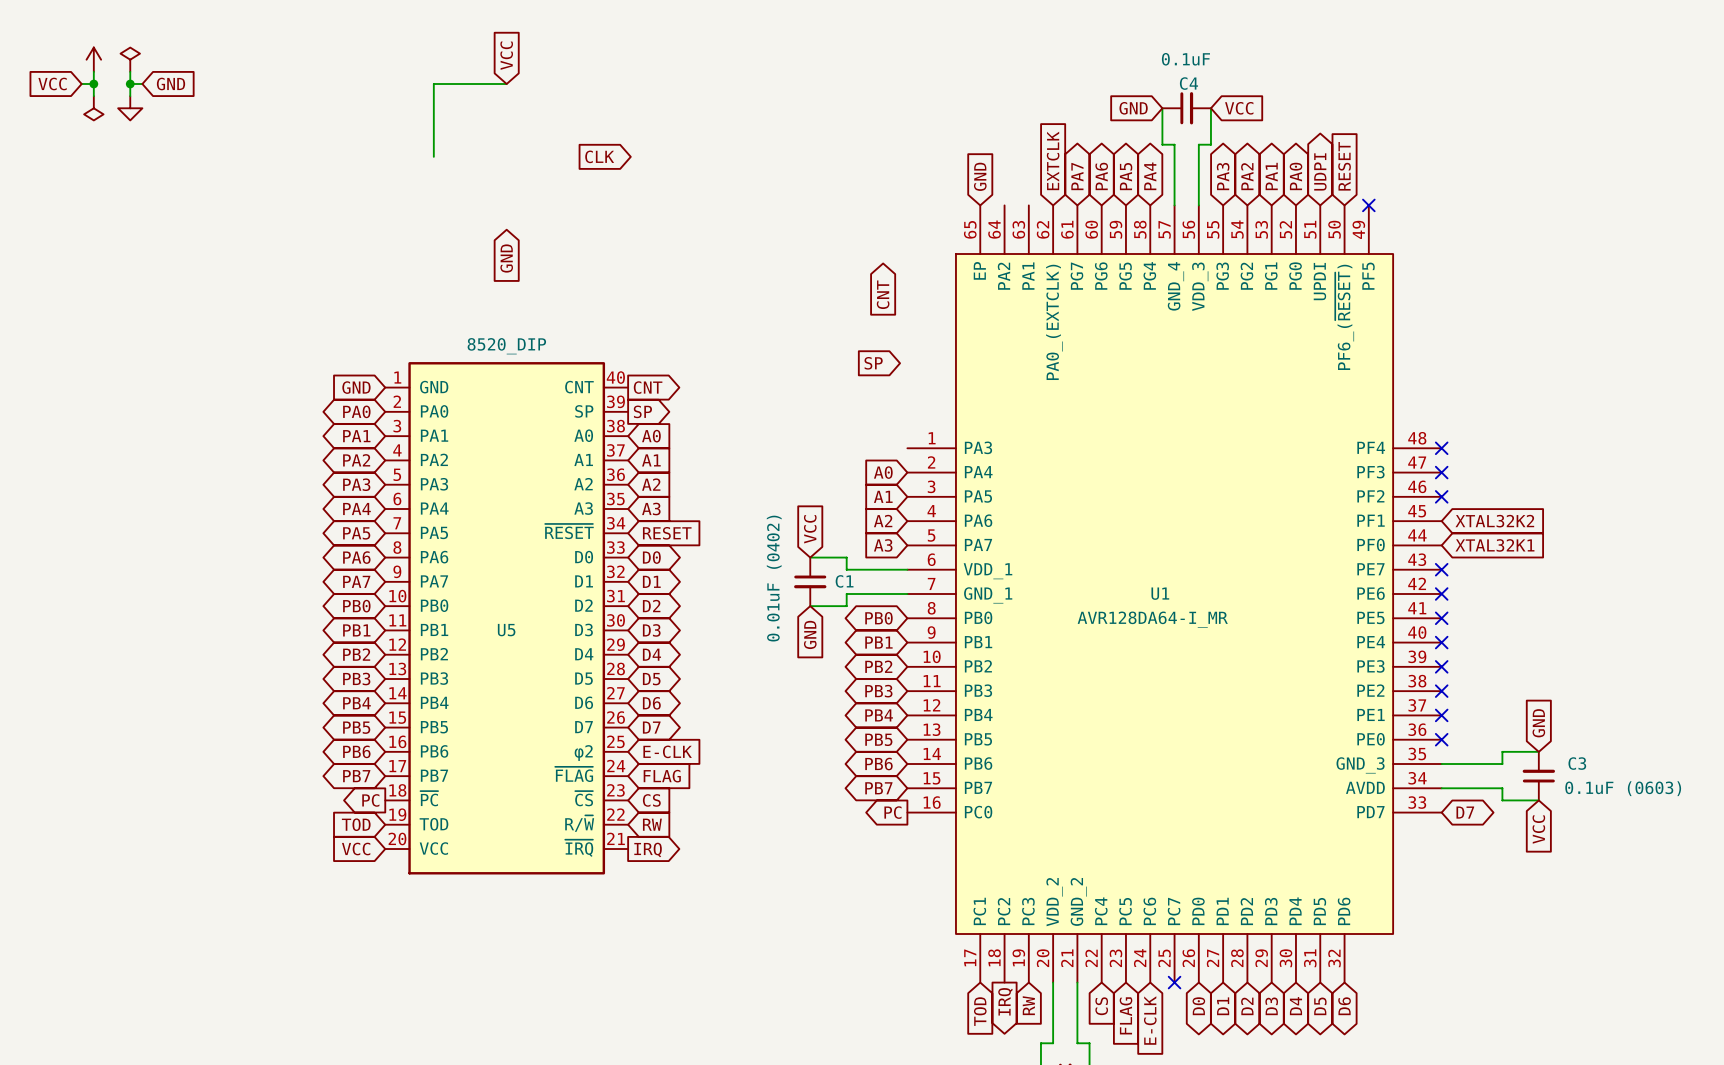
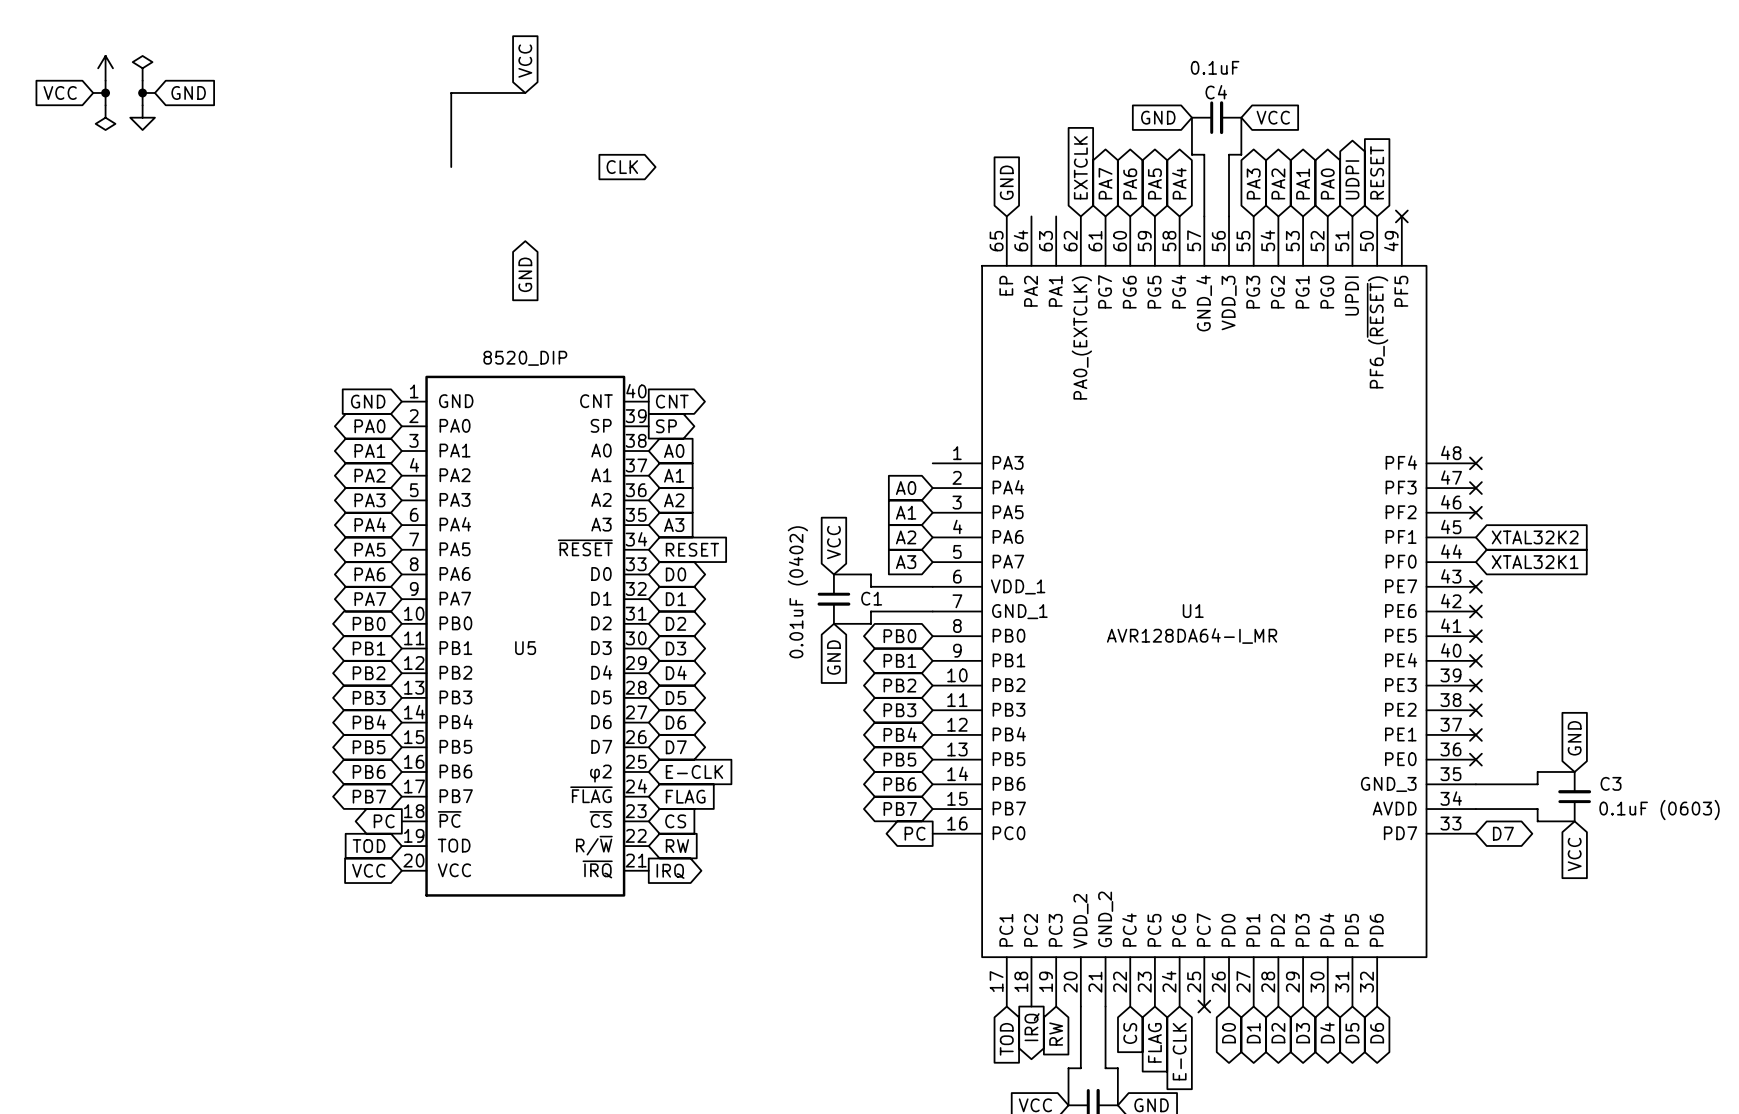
global label: CNT (883, 294) -> none
global label: SP (873, 363) -> none

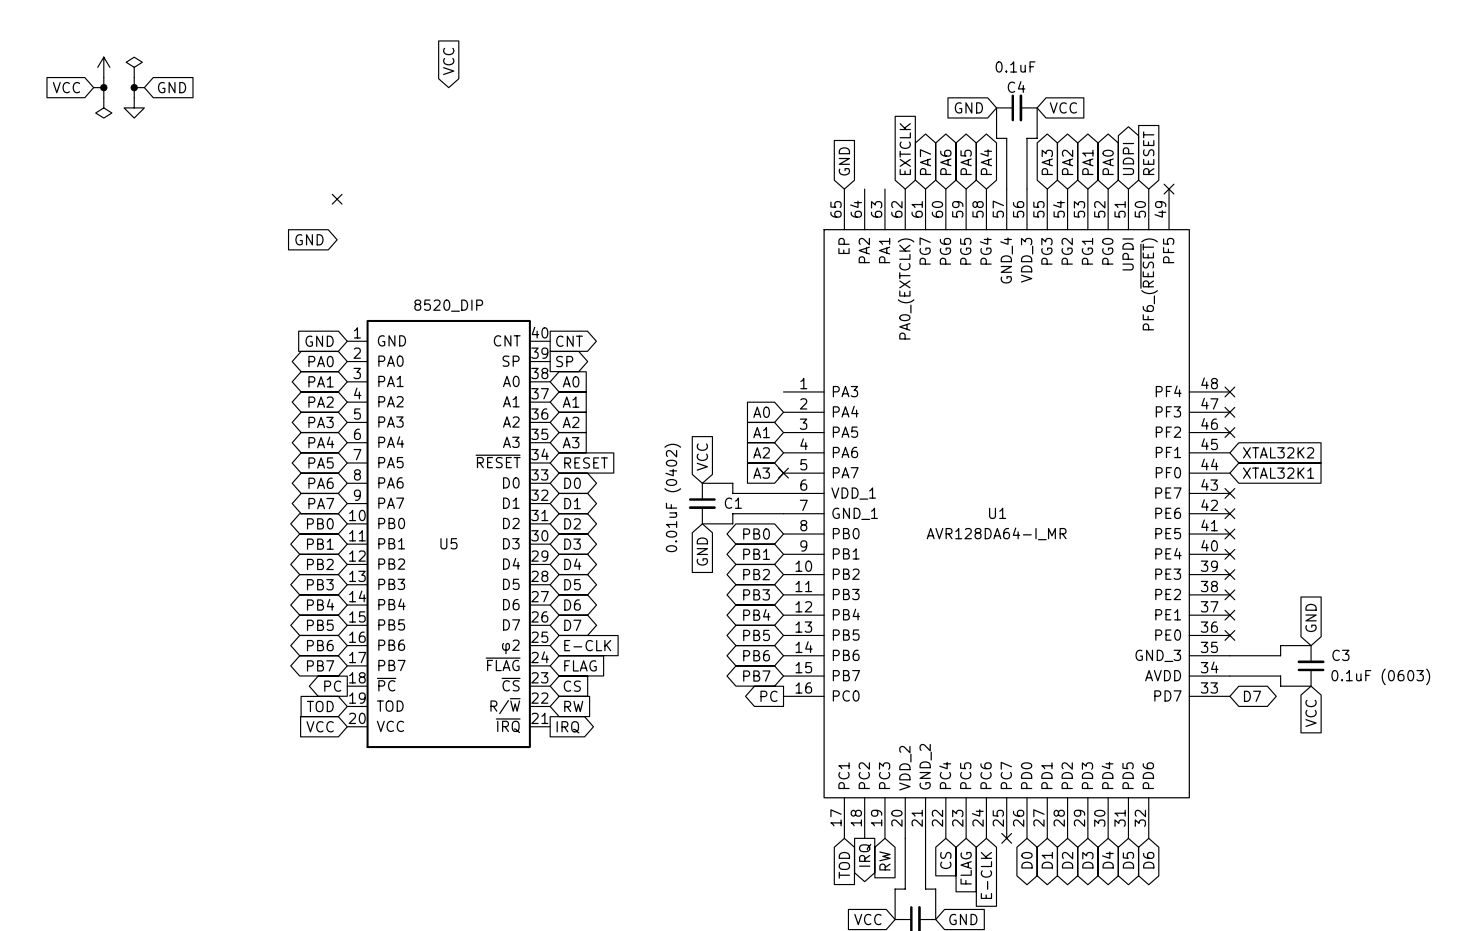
wire: (525, 92) (451, 92) (451, 167) -> none
global label: CLK (622, 167) -> none
no-connect mark: none -> (337, 199)
global label rotation: 0° (525, 274) -> 90° clockwise (309, 239)
global label position: GND (525, 274) -> GND (309, 239)
no-connect mark: none -> (783, 473)

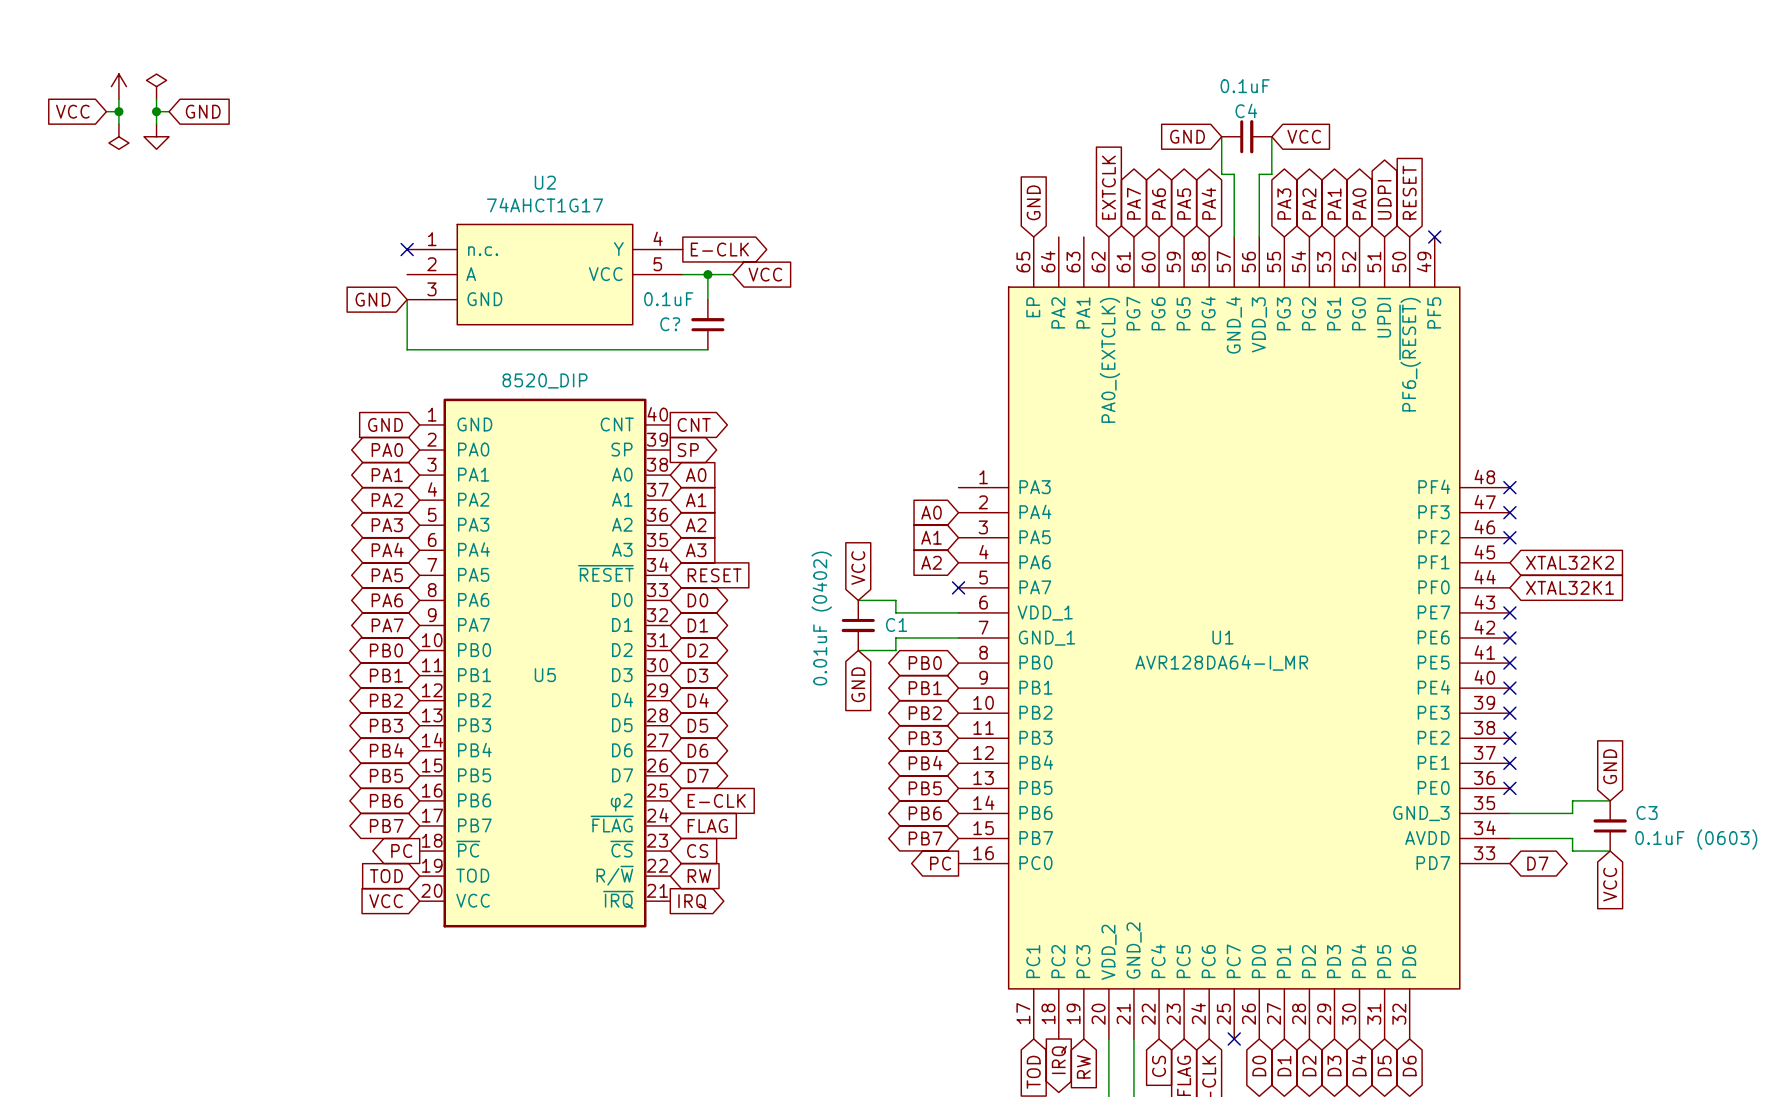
global label: VCC (448, 61) -> none
global label: none -> E-CLK (719, 249)
U2: none -> 74AHCT1G17 (545, 274)
wire: none -> (682, 274) (732, 274)
wire: none -> (707, 274) (707, 299)
junction: none -> (707, 274)
global label: none -> VCC (765, 274)
wire: none -> (407, 299) (407, 349) (707, 349)
C?: none -> 0.1uF (707, 324)
global label: A3 (761, 473) -> none

